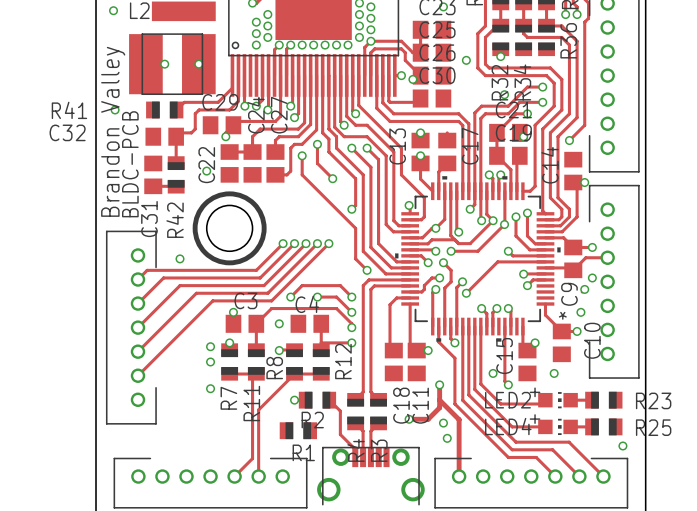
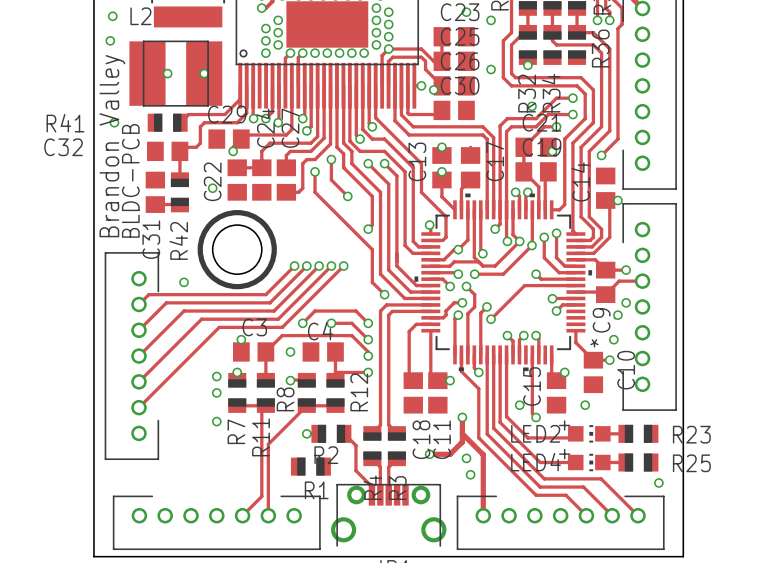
via: none -> (491, 20)
via: none -> (110, 40)

